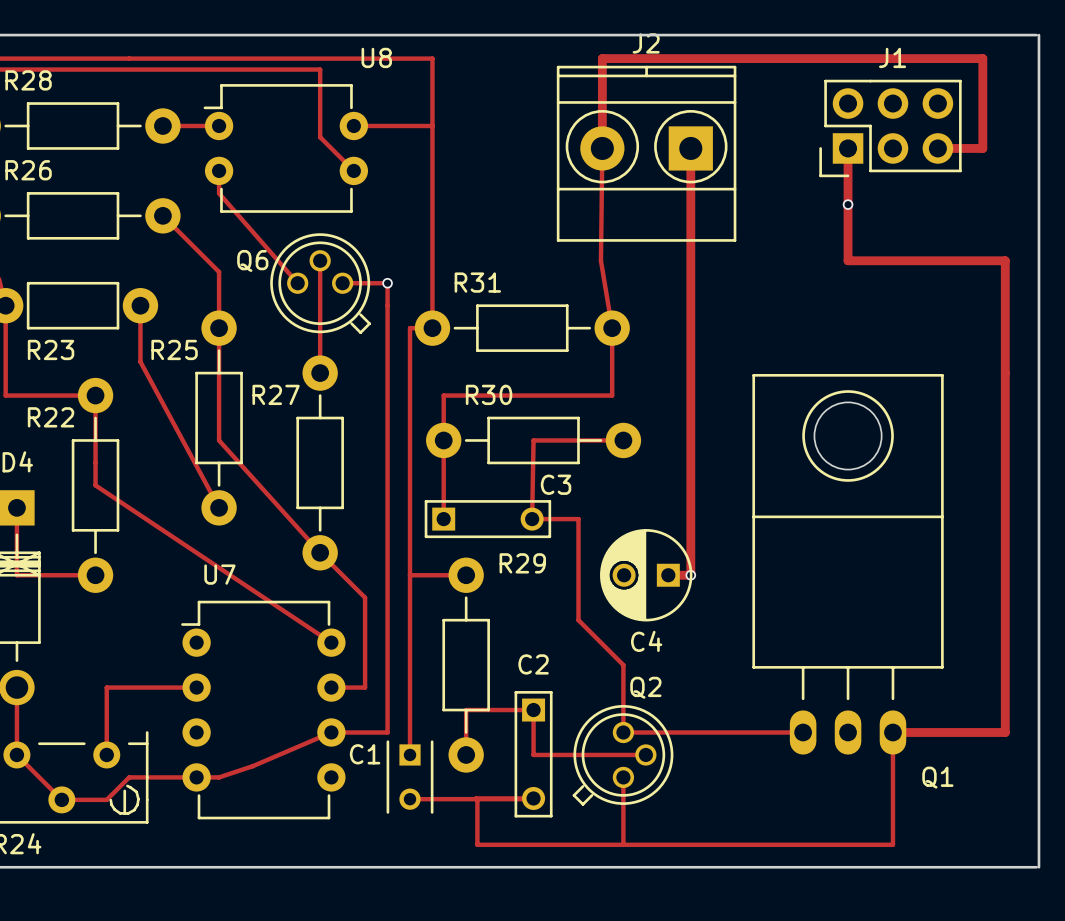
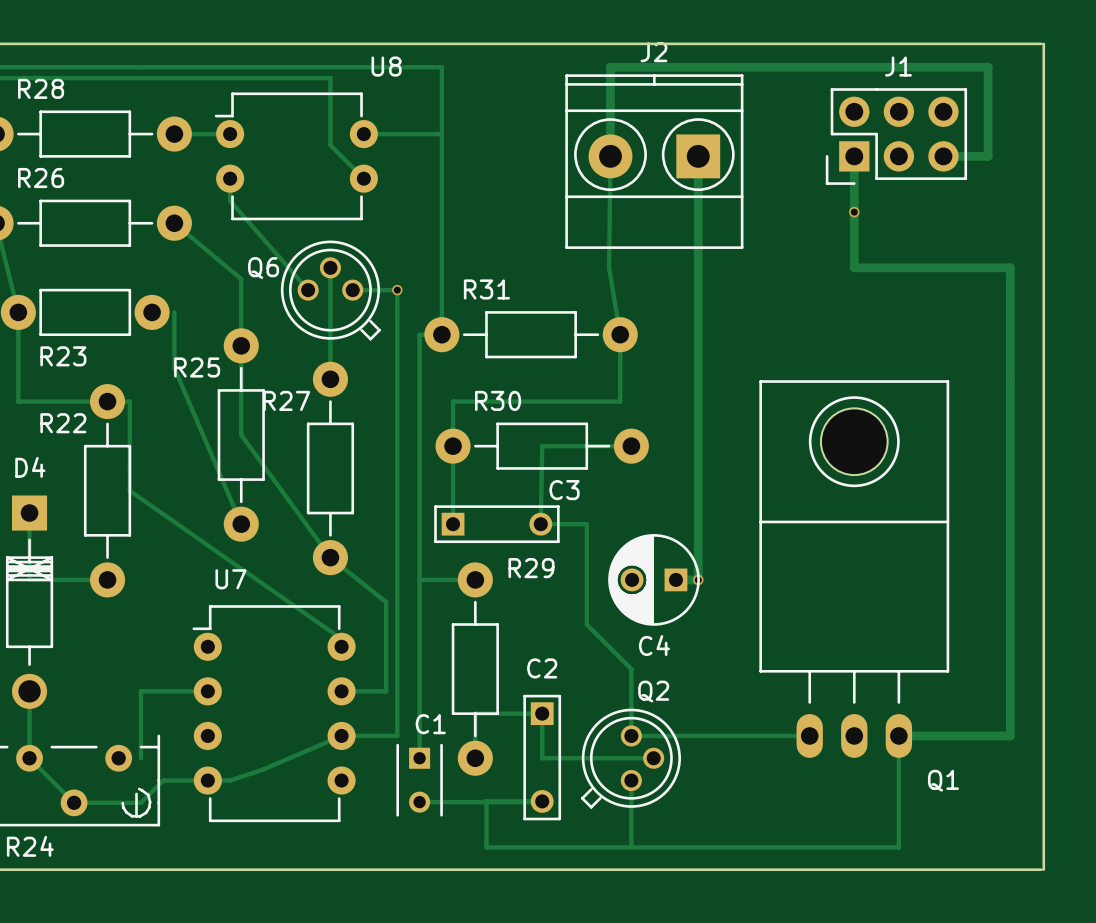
track: (162, 215) (219, 272) (219, 440) (320, 552) (365, 597) (365, 687) -> (174, 223) (241, 278) (241, 435) (330, 557) (386, 602) (386, 691) (375, 691)
track: (140, 305) (140, 361) (219, 507) -> none
track: none -> (174, 312) (174, 368) (241, 524)
track: (95, 395) (95, 485) (331, 642) -> (107, 401) (129, 401) (129, 490) (352, 646)
R25 position: (219, 418) -> (241, 435)
track: (129, 687) (106, 687) (106, 754) -> (140, 691) (140, 758)
C1 name position: C1 (365, 754) -> C1 (430, 724)
track: (151, 777) (129, 777) (106, 799) -> (163, 780) (140, 802) (118, 802)

